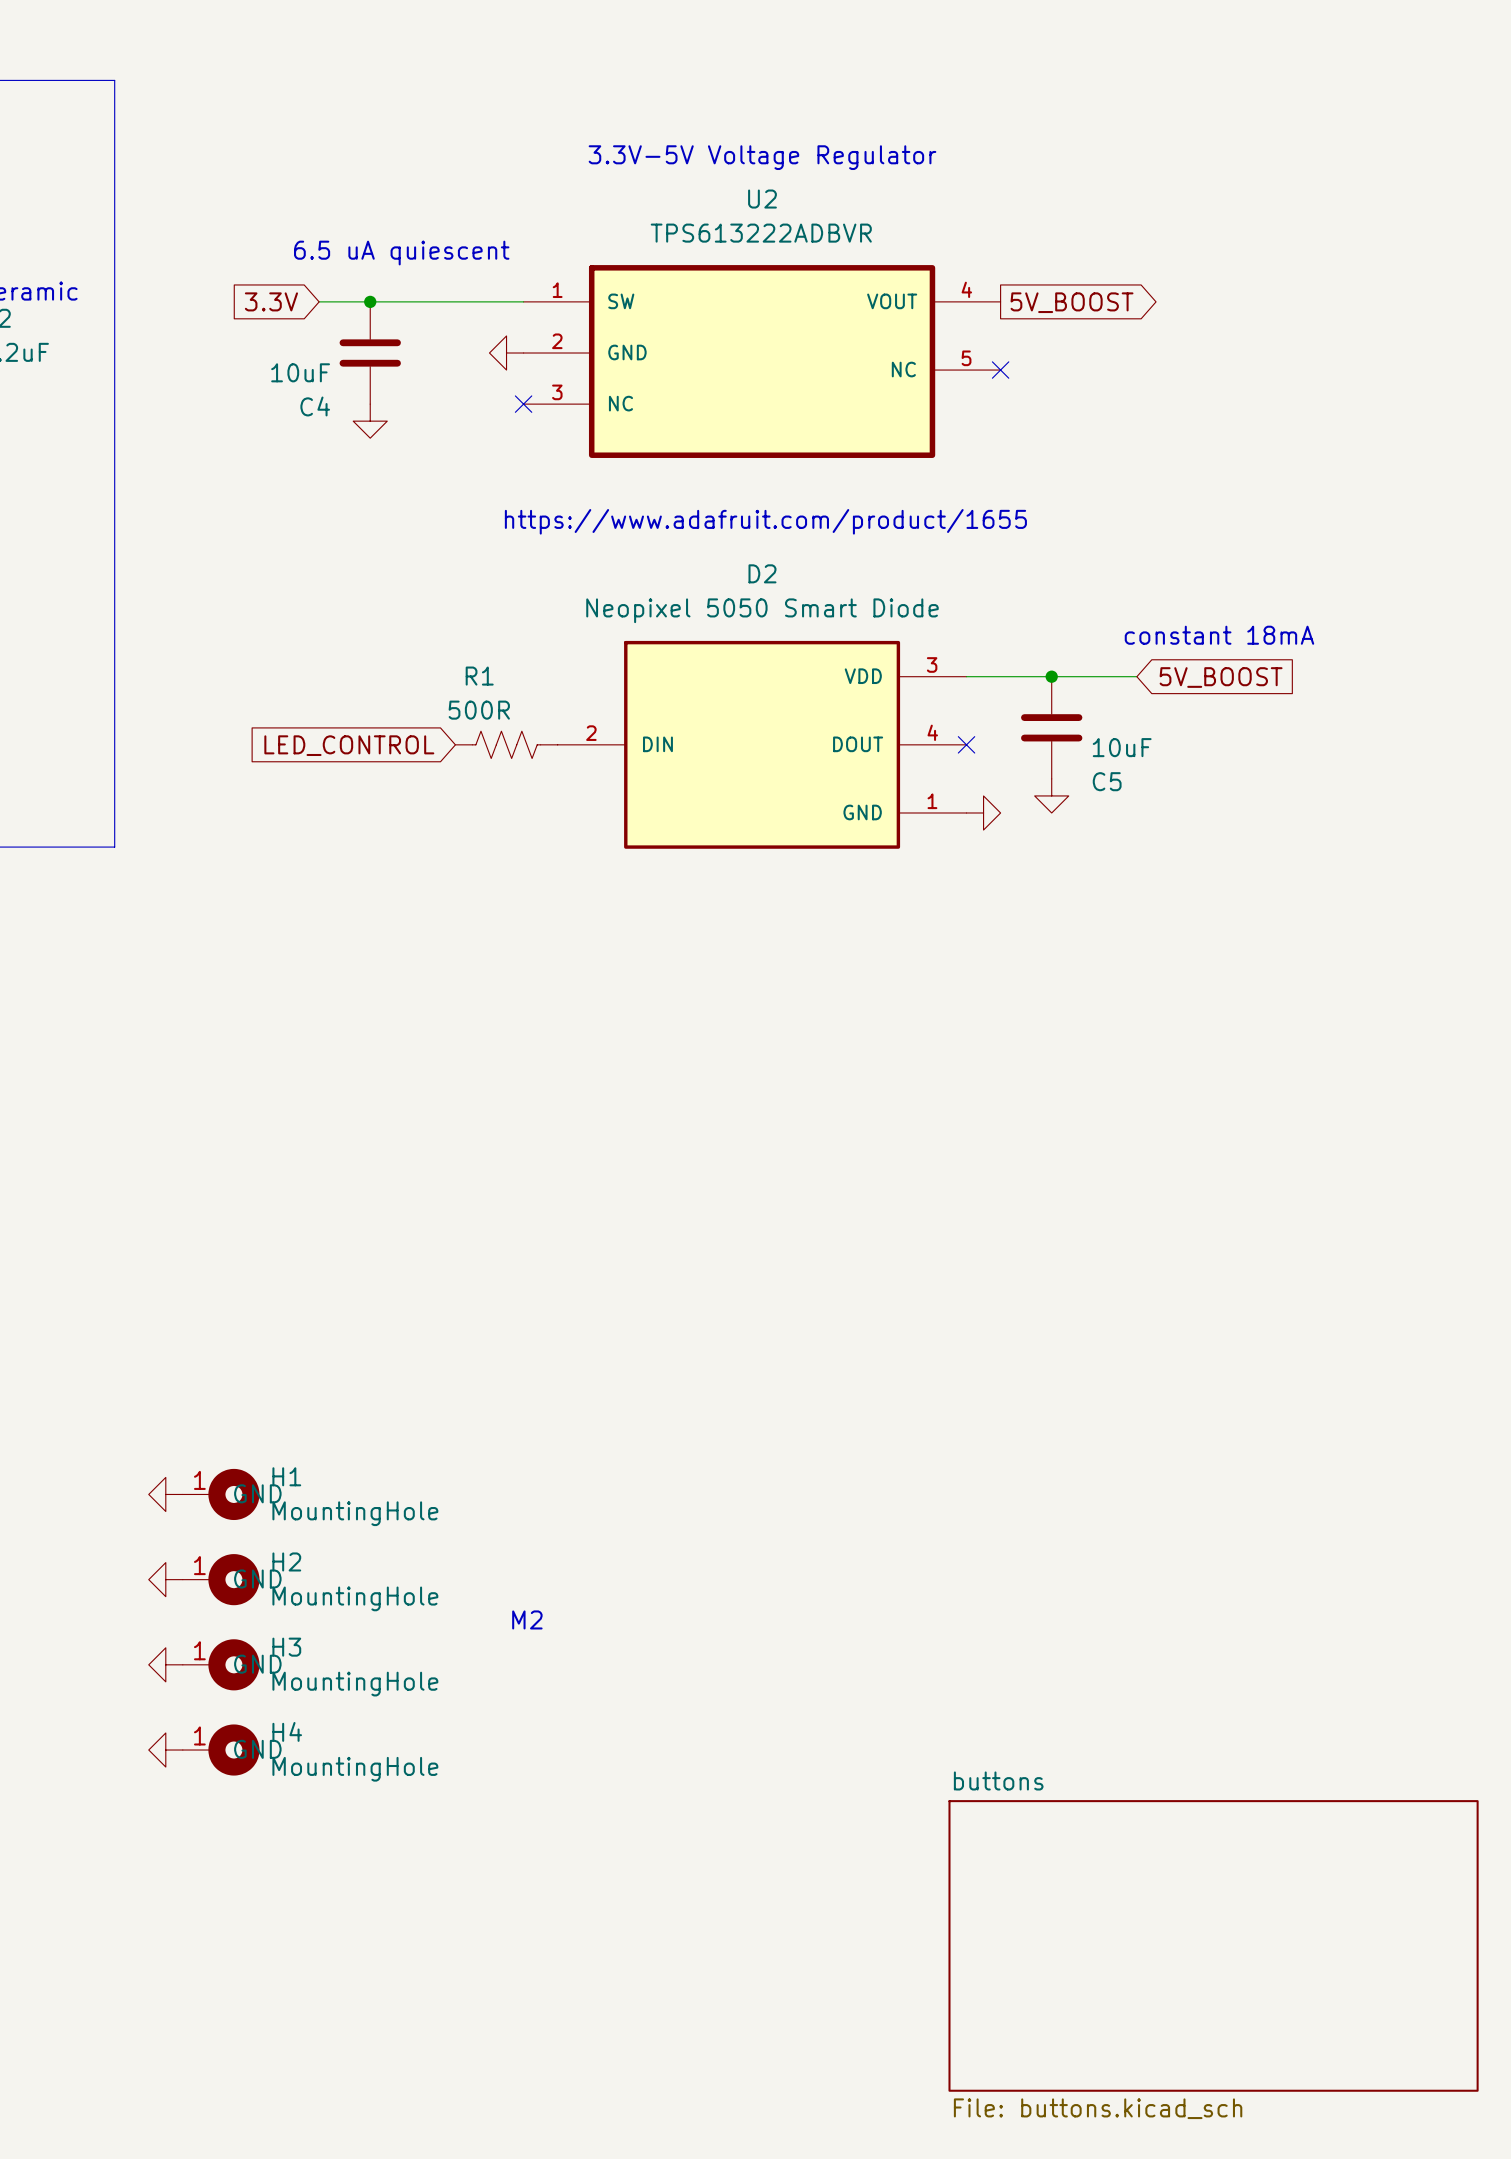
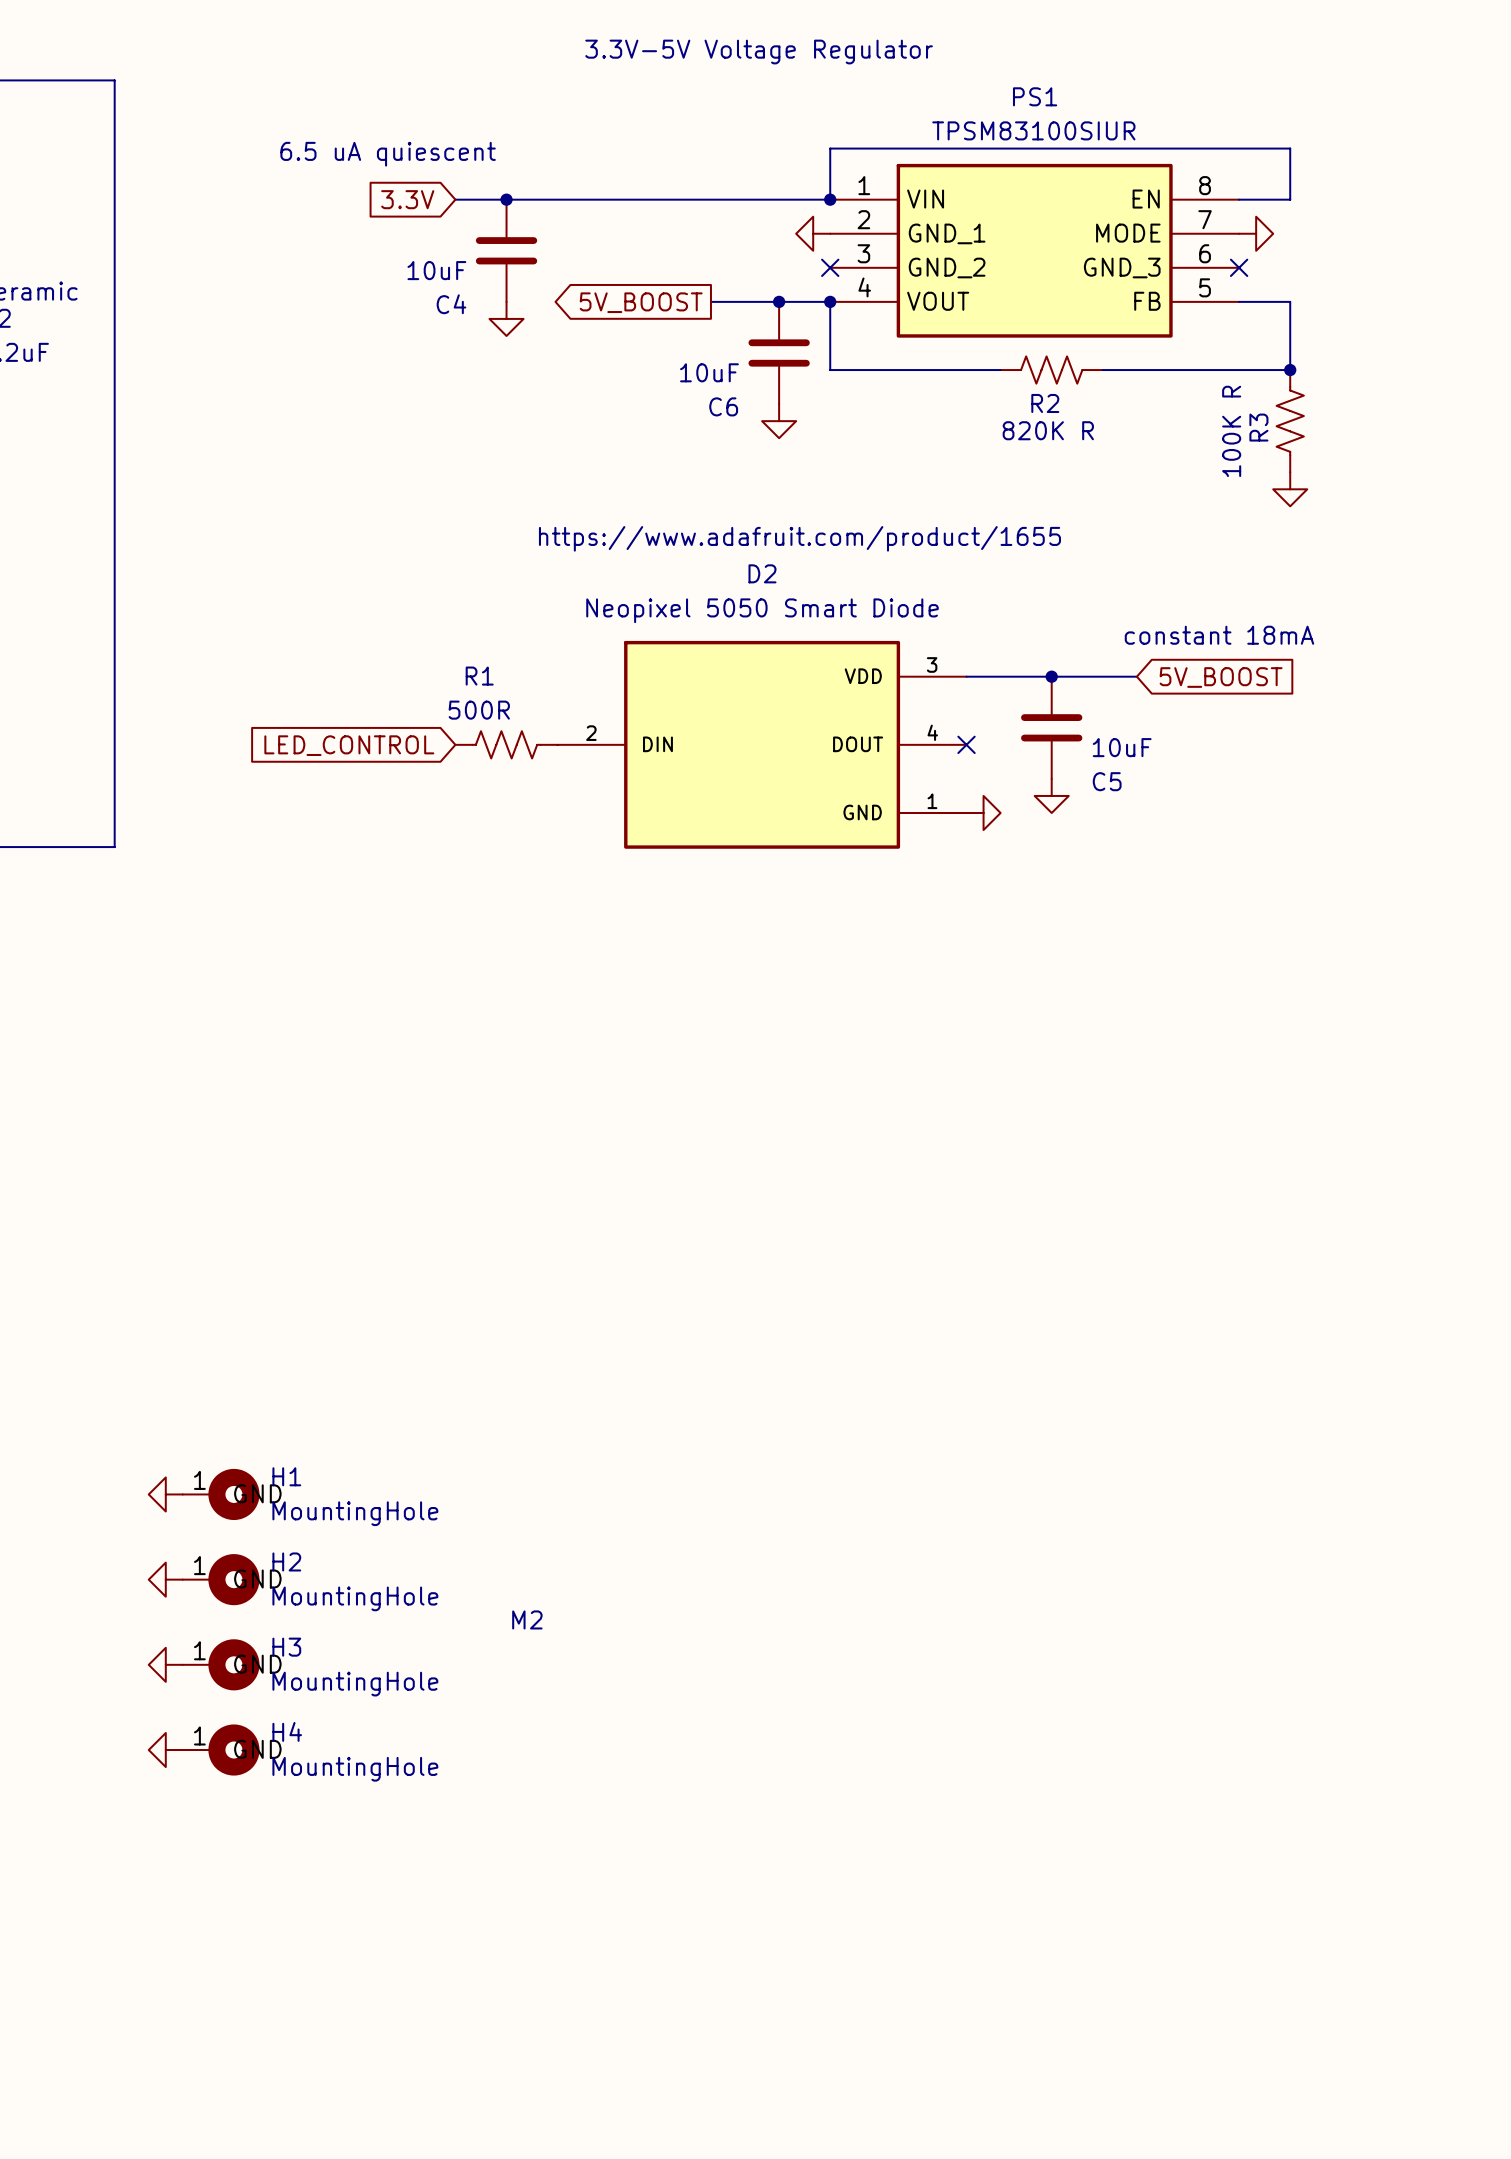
text position: 3.3V-5V Voltage Regulator (762, 157) -> 3.3V-5V Voltage Regulator (759, 52)
wire: none -> (455, 199) (830, 199) (830, 148) (1290, 148) (1290, 199) (1239, 199)
junction: none -> (506, 199)
junction: none -> (830, 199)
power symbol: none -> (813, 233)
power symbol: none -> (1256, 233)
PS1: none -> TPSM83100SIUR (1034, 250)
text position: 6.5 uA quiescent (401, 253) -> 6.5 uA quiescent (388, 154)
no-connect mark: none -> (830, 267)
no-connect mark: none -> (1239, 267)
global label position: 3.3V (271, 301) -> 3.3V (407, 199)
wire: (319, 301) (523, 301) -> none
junction: (370, 301) -> none
junction: none -> (779, 301)
junction: none -> (830, 301)
wire: none -> (1239, 301) (1290, 301) (1290, 370) (1102, 370)
global label rotation: 0° (1072, 302) -> 180° (641, 302)
global label position: 5V_BOOST (1072, 302) -> 5V_BOOST (641, 302)
C4 position: (370, 353) -> (506, 250)
power symbol rotation: 0° (506, 353) -> 90° counterclockwise (506, 318)
power symbol position: (506, 353) -> (506, 318)
C6: none -> 10uF (779, 353)
U2: TPS613222ADBVR (762, 361) -> none
no-connect mark: (1000, 370) -> none
R2: none -> 820K R (1051, 370)
junction: none -> (1290, 370)
no-connect mark: (523, 404) -> none
power symbol: (370, 421) -> none
power symbol: none -> (779, 421)
R3: none -> 100K R (1290, 421)
power symbol: none -> (1290, 489)
text position: https://www.adafruit.com/product/1655 (765, 521) -> https://www.adafruit.com/product/1655 (799, 538)
sheet buttons: File: buttons.kicad_sch (1213, 1945) -> none

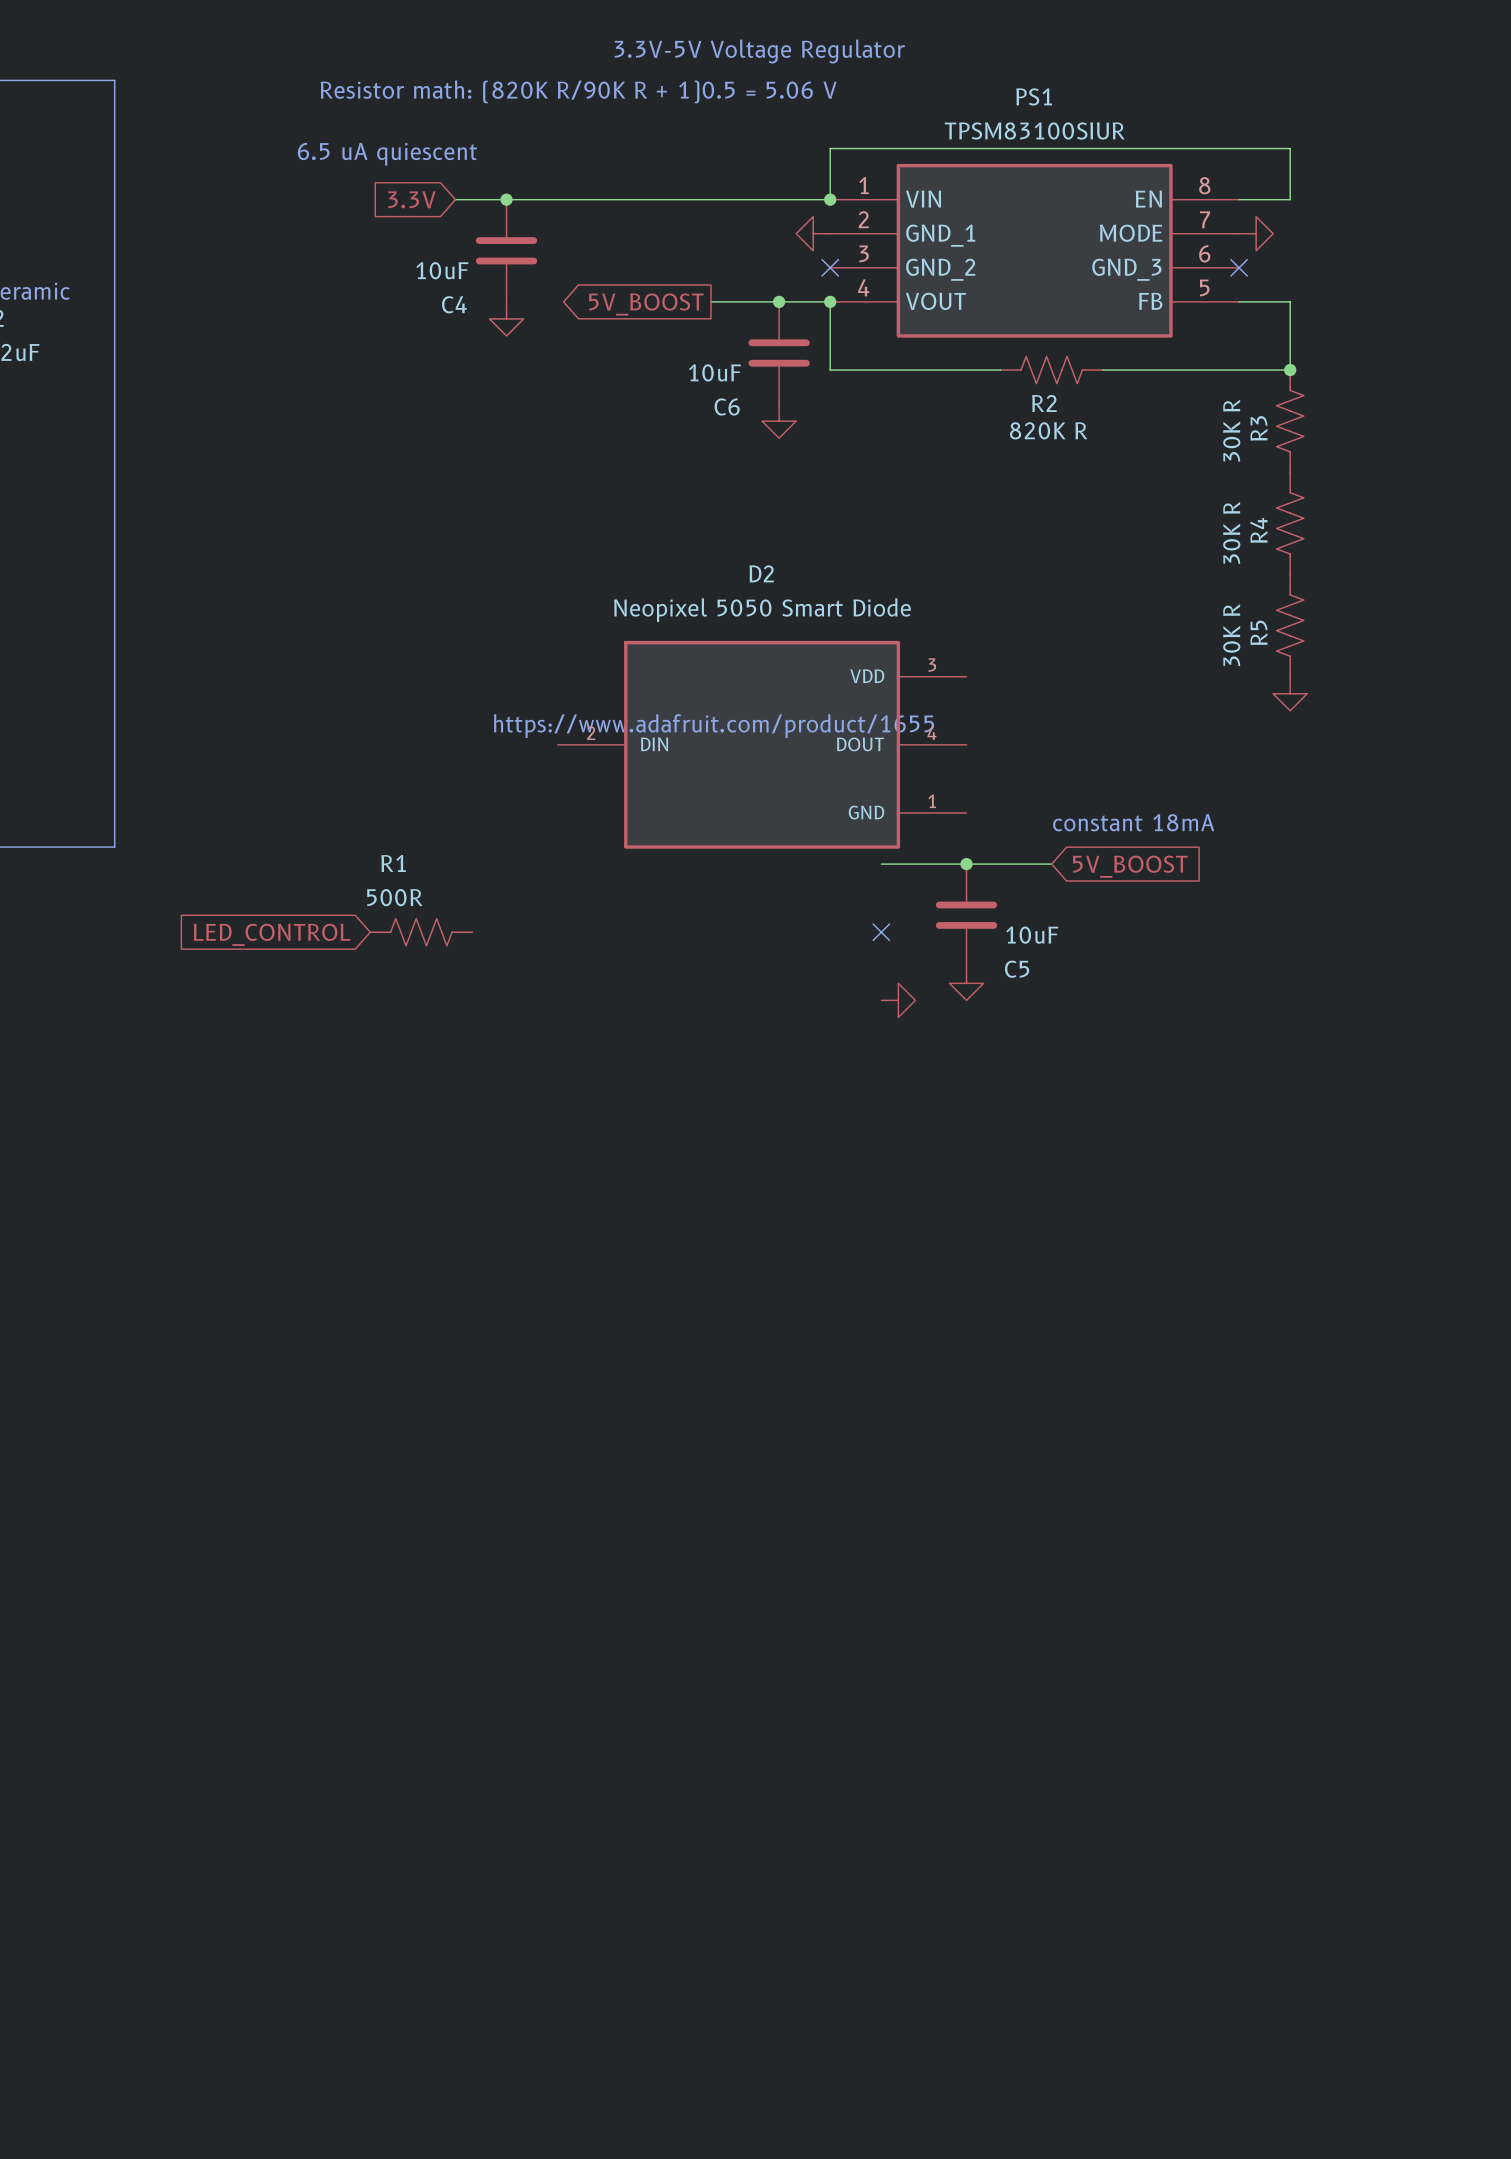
text: none -> Resistor math: (820K R/90K R + 1)0.5 = 5.06 V (578, 91)
R3 value: 100K R (1231, 431) -> 30K R (1231, 430)
power symbol: (1290, 489) -> none
R4: none -> 30K R (1290, 523)
text position: https://www.adafruit.com/product/1655 (799, 538) -> https://www.adafruit.com/product/1655 (713, 726)
R5: none -> 30K R (1290, 625)
text position: constant 18mA (1219, 635) -> constant 18mA (1133, 822)
wire: (966, 676) (1136, 676) -> (881, 864) (1051, 864)
junction: (1051, 676) -> none
global label position: 5V_BOOST (1221, 677) -> 5V_BOOST (1130, 866)
power symbol: none -> (1290, 693)
C5 position: (1051, 727) -> (966, 915)
R1 position: (506, 744) -> (421, 932)
no-connect mark: (966, 744) -> none
global label position: LED_CONTROL (349, 745) -> LED_CONTROL (272, 934)
power symbol: (1051, 795) -> none
power symbol: (983, 812) -> none
junction: none -> (966, 864)
no-connect mark: none -> (881, 932)
power symbol: none -> (966, 983)
power symbol: none -> (898, 1000)
power symbol: (165, 1494) -> none
H1: MountingHole (221, 1494) -> none
power symbol: (165, 1579) -> none
H2: MountingHole (221, 1579) -> none
text: M2 (527, 1619) -> none
power symbol: (165, 1664) -> none
H3: MountingHole (221, 1664) -> none
power symbol: (165, 1750) -> none
H4: MountingHole (221, 1750) -> none

